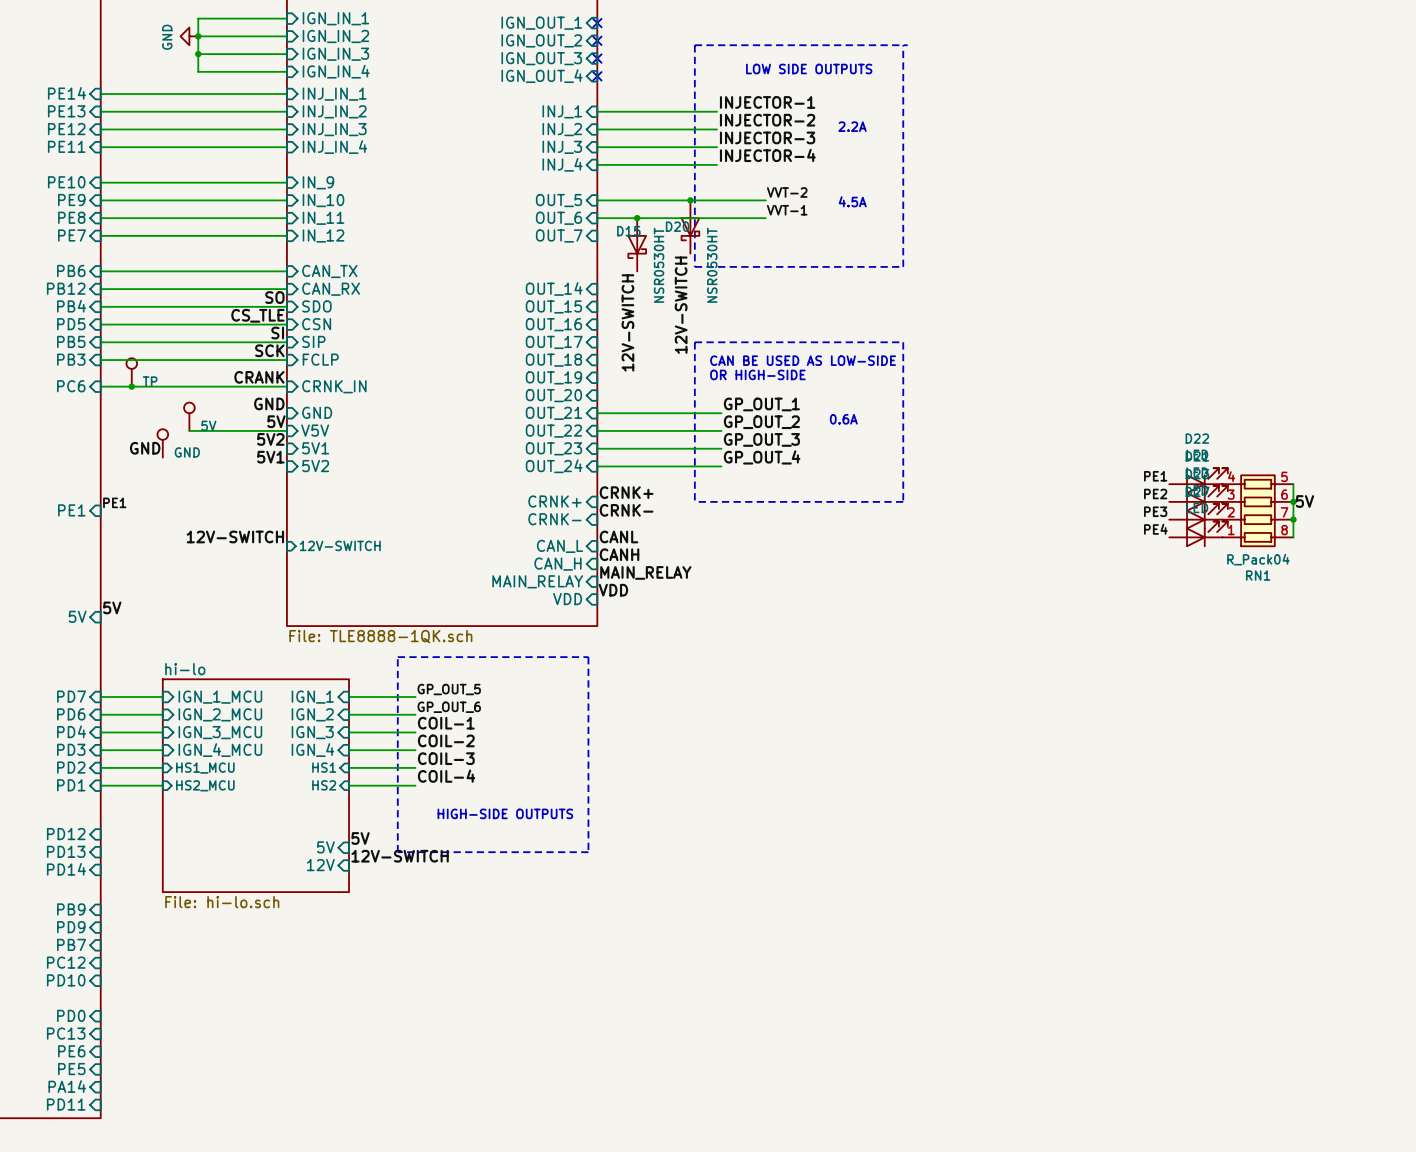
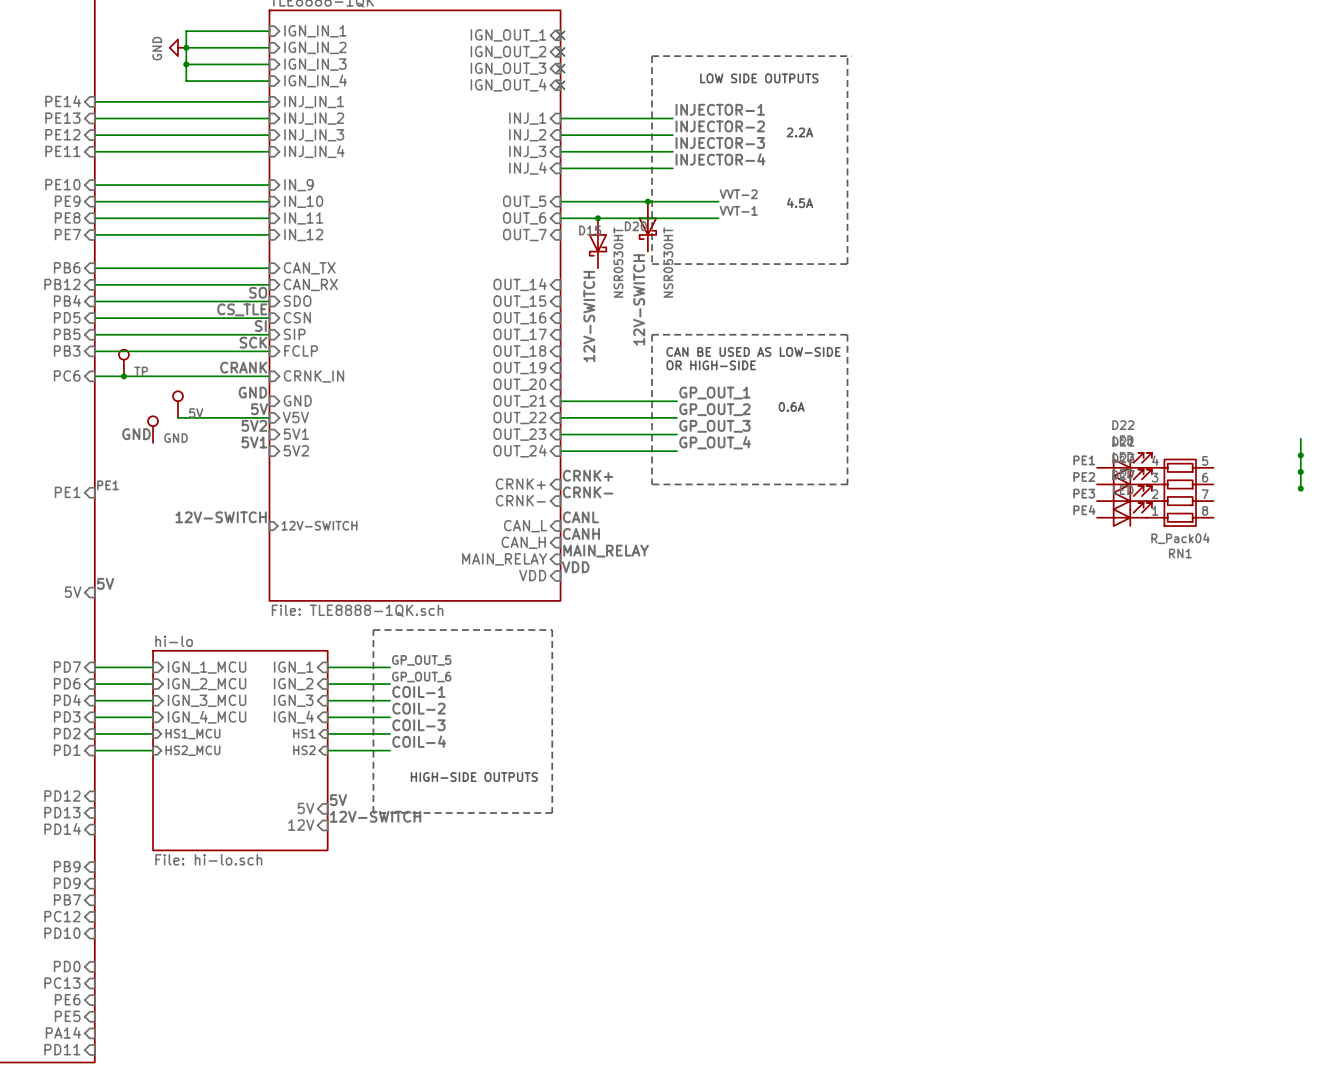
junction: none -> (1300, 455)
wire: (1293, 484) (1293, 537) -> (1300, 438) (1300, 488)
junction: none -> (1300, 471)
junction: (1293, 501) -> none
label: 5V (1304, 501) -> none
junction: none -> (1300, 488)
junction: (1293, 519) -> none

